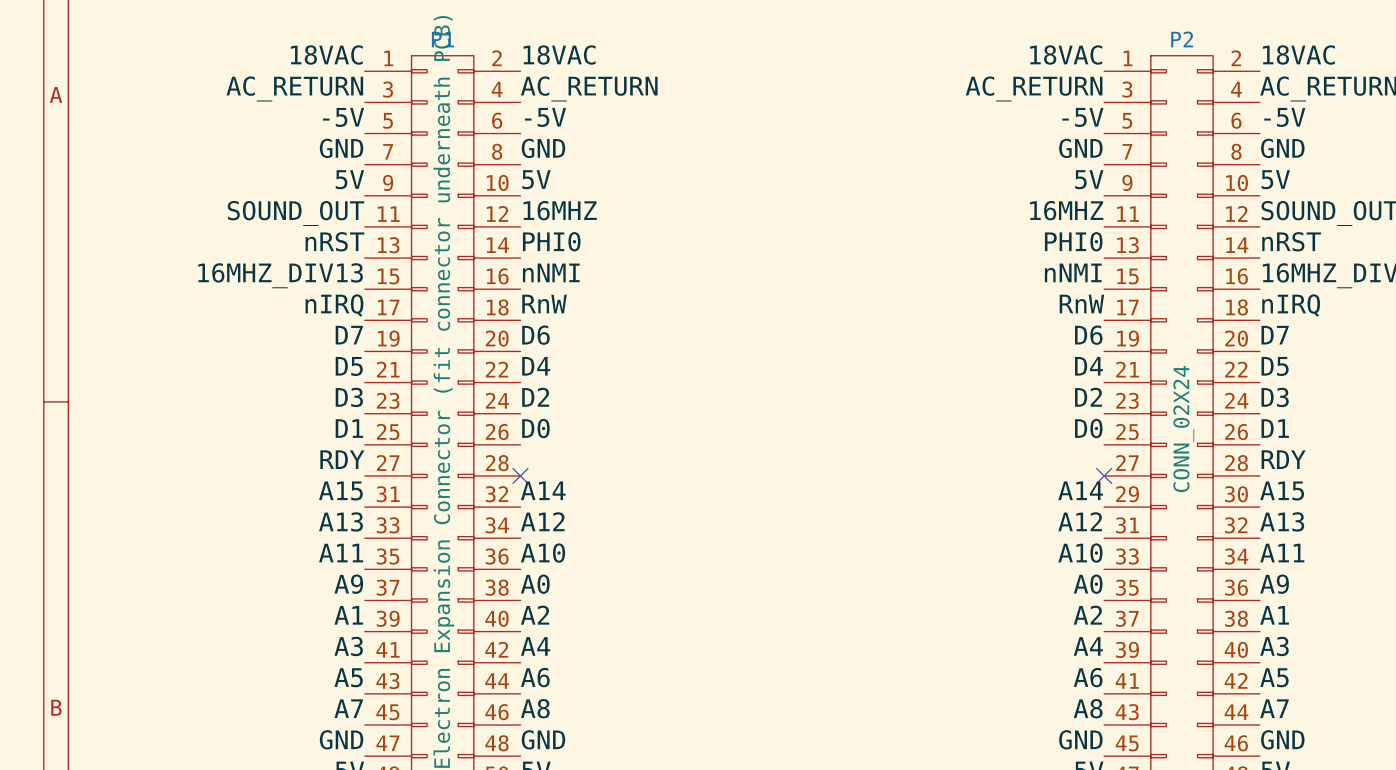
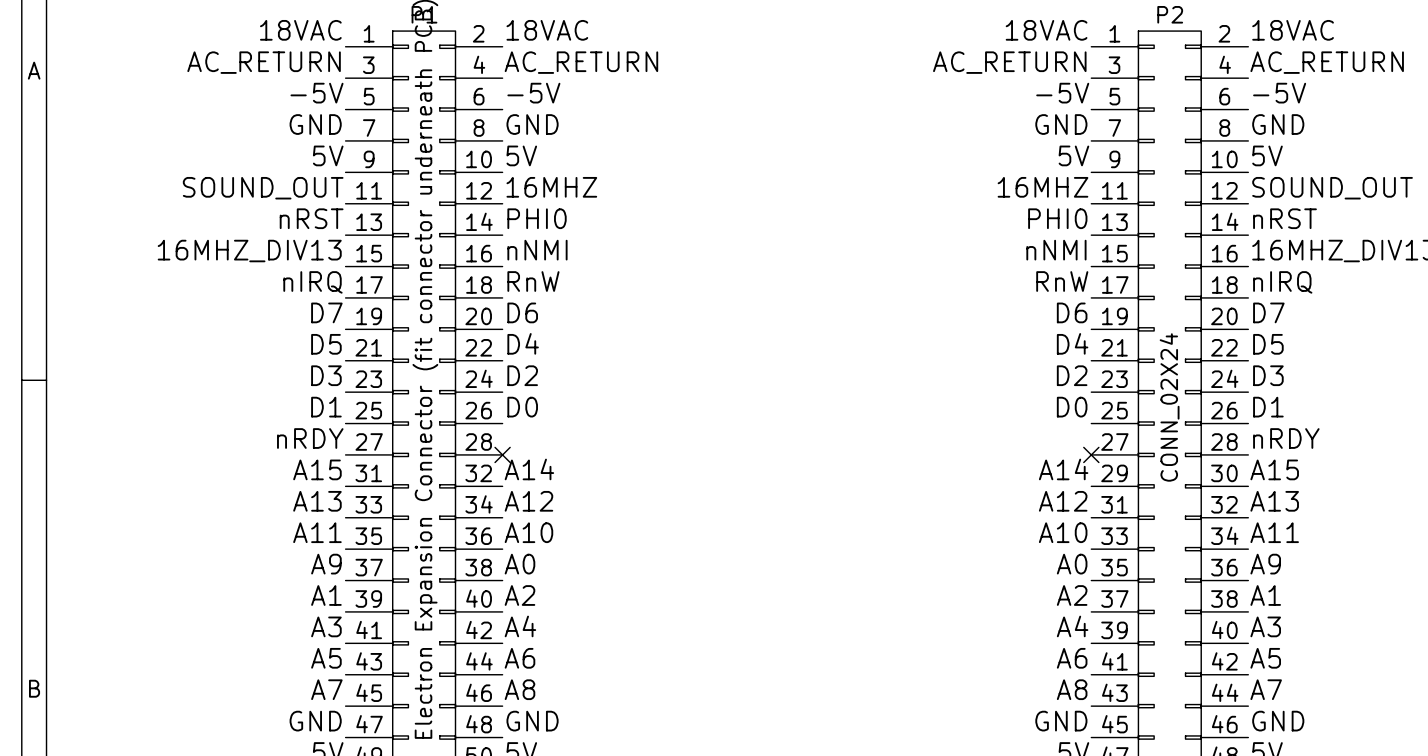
label: RDY (342, 459) -> nRDY (310, 438)
label: RDY (1283, 459) -> nRDY (1286, 438)

